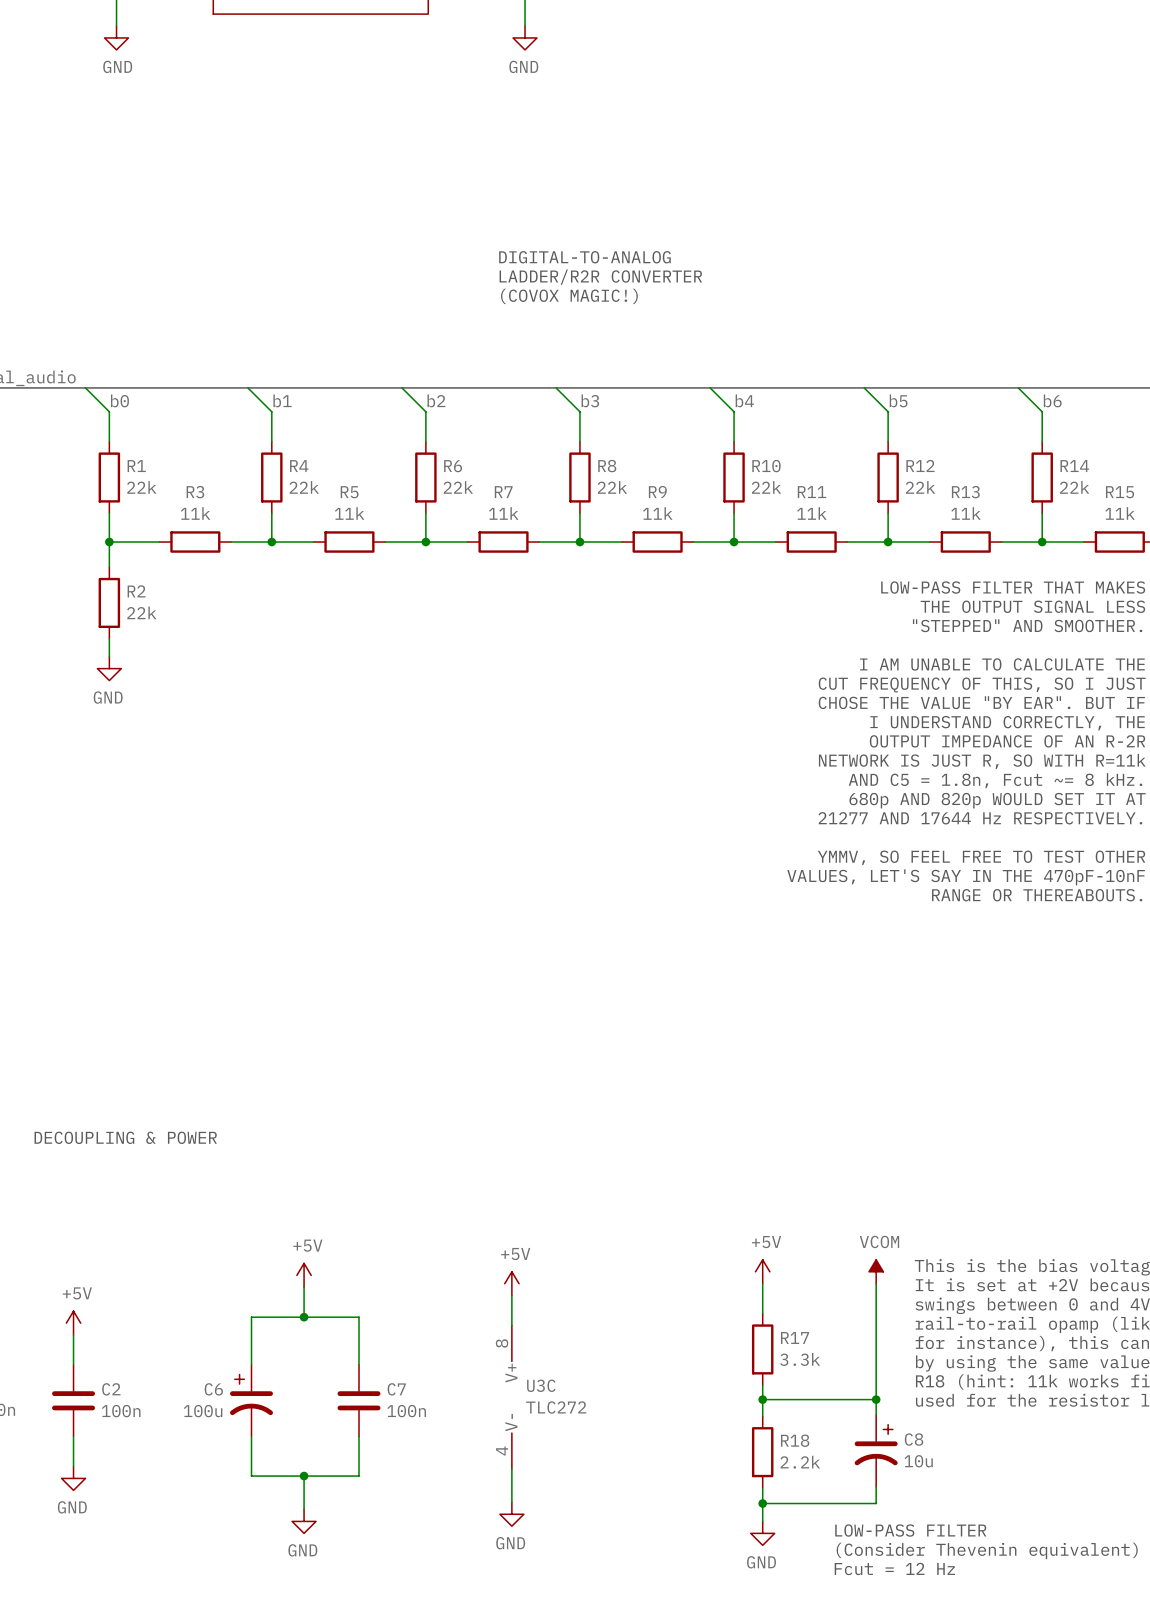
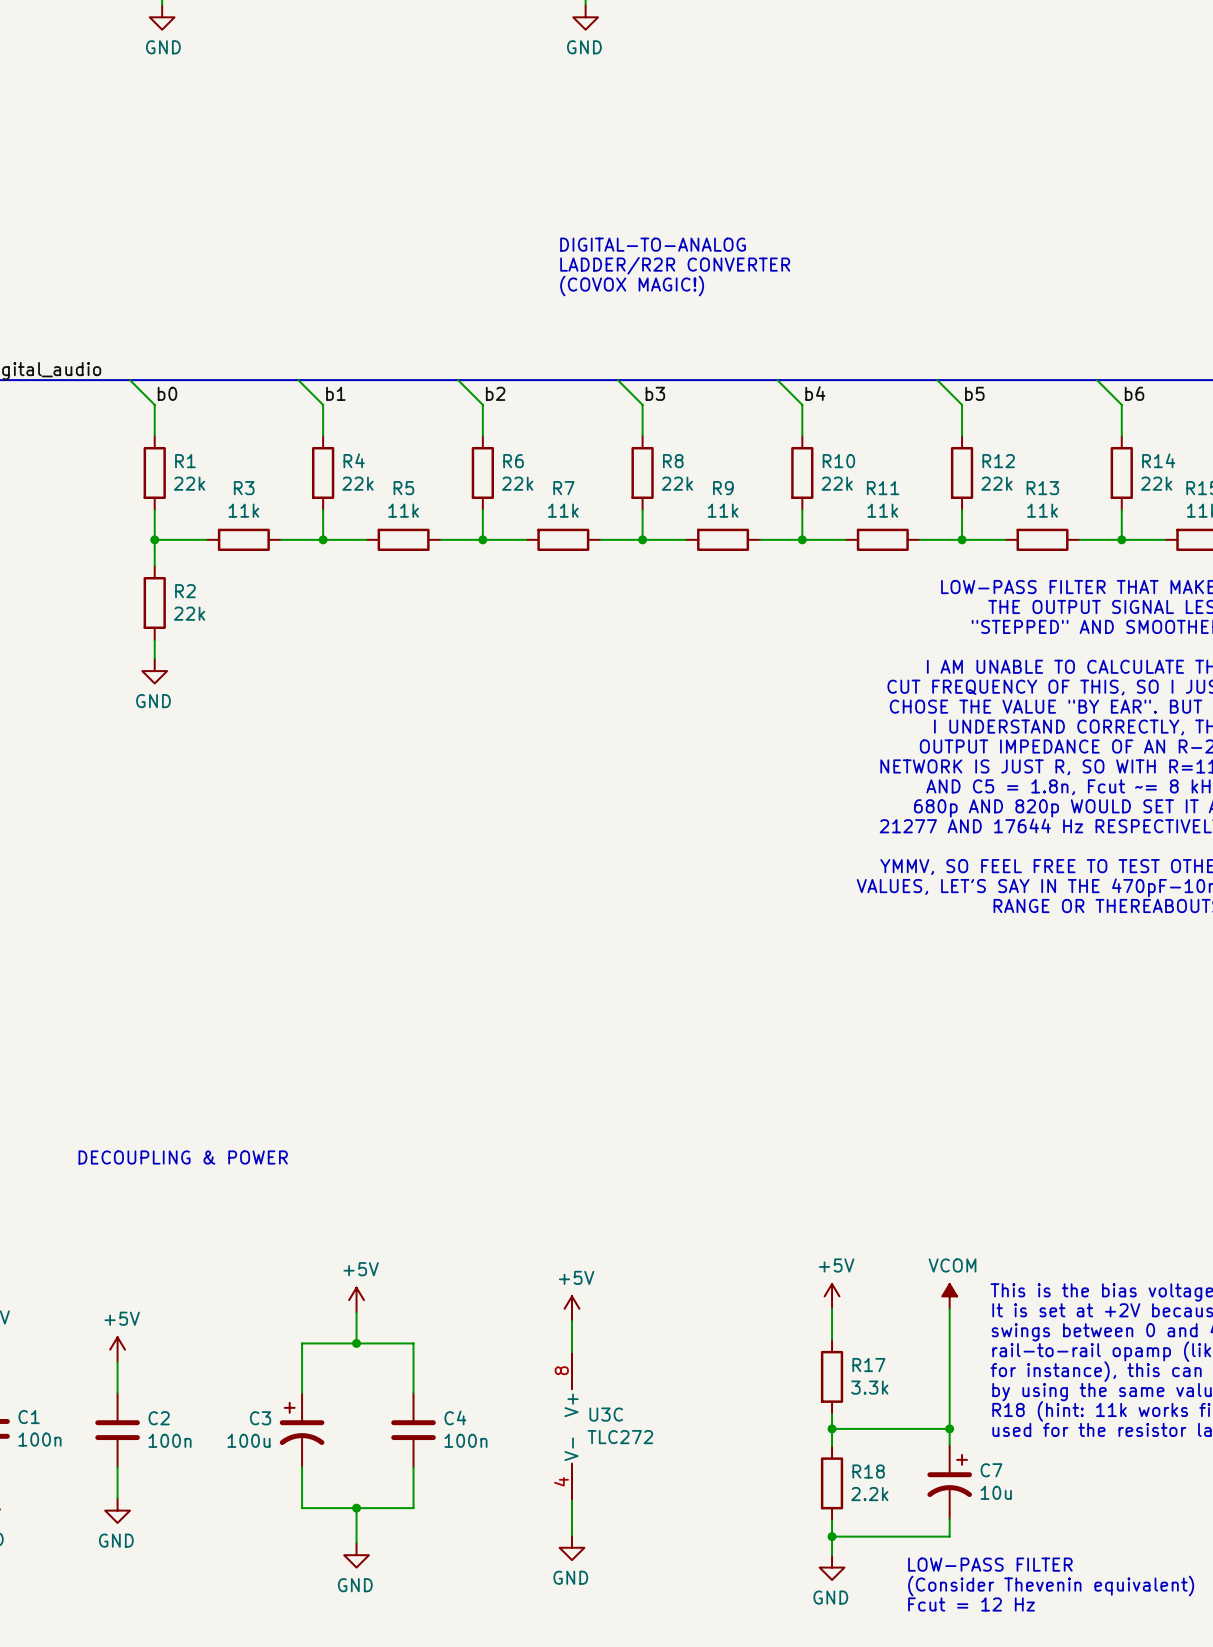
C6 name: C6 (213, 1389) -> C3 (260, 1418)
C7 name: C7 (396, 1389) -> C4 (455, 1417)
C8 name: C8 (914, 1439) -> C7 (991, 1470)

